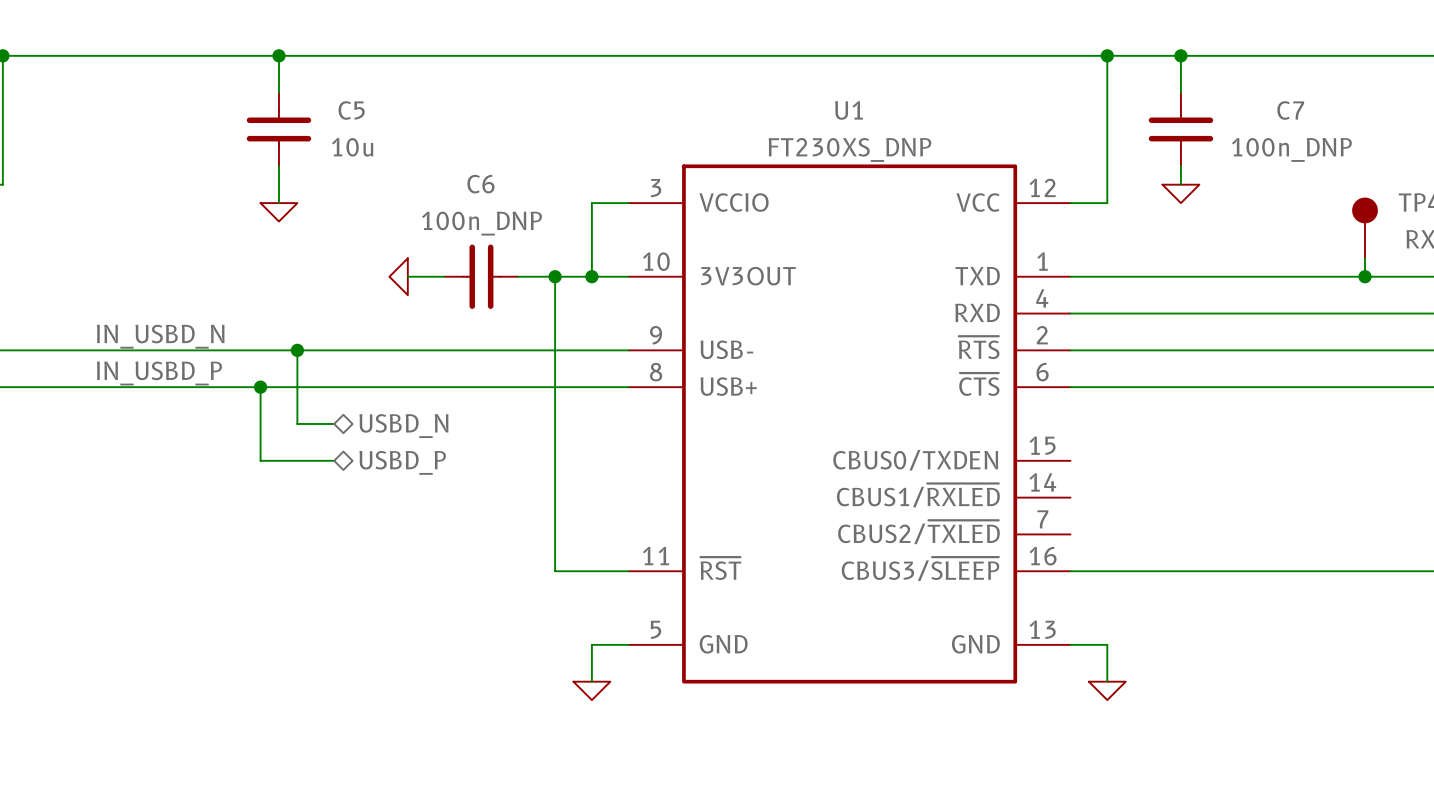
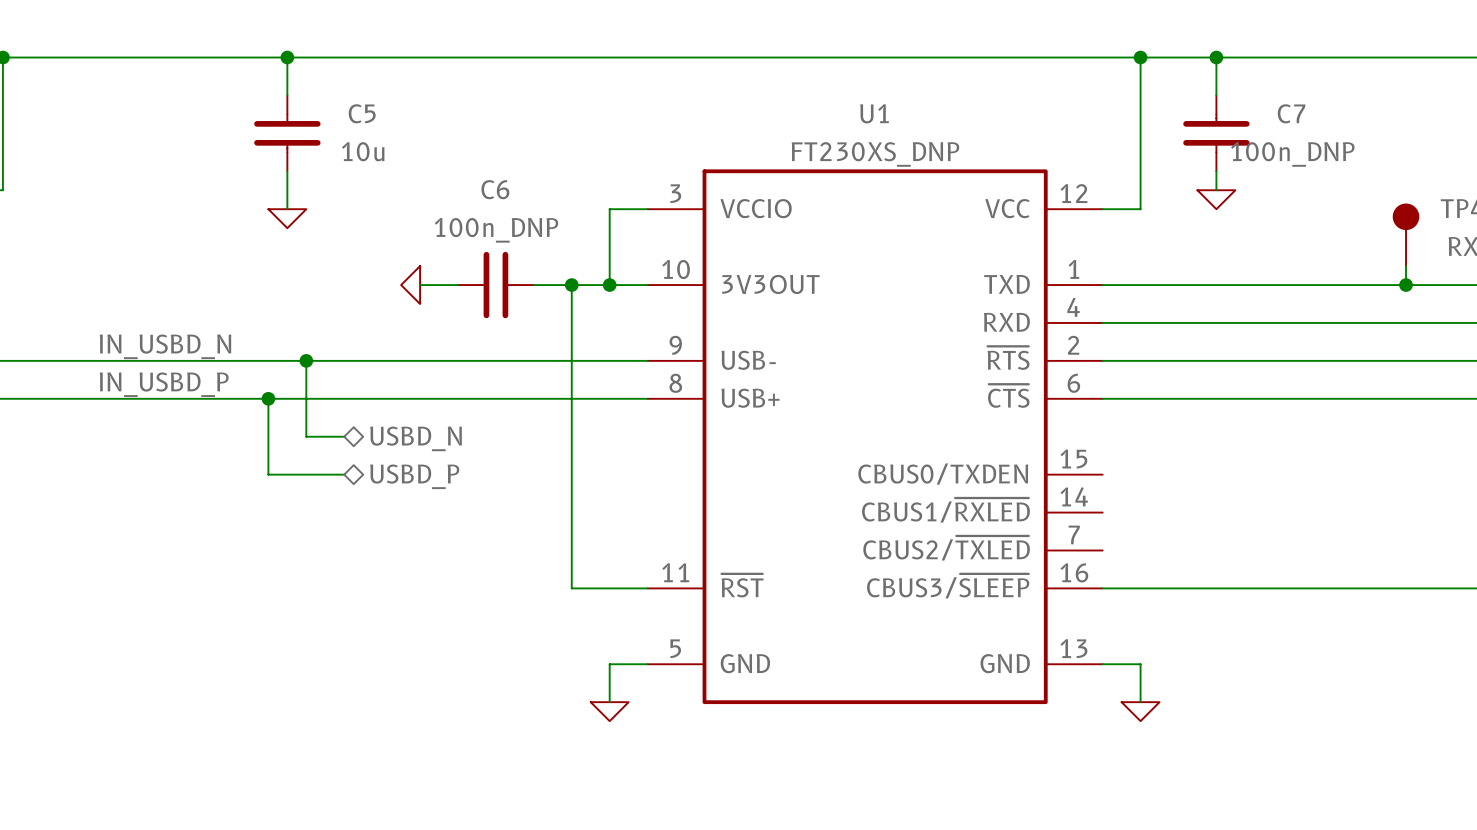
C7 name position: C7 (1290, 110) -> C7 (1291, 113)
C7 value position: 100n_DNP (1291, 149) -> 100n_DNP (1292, 154)

